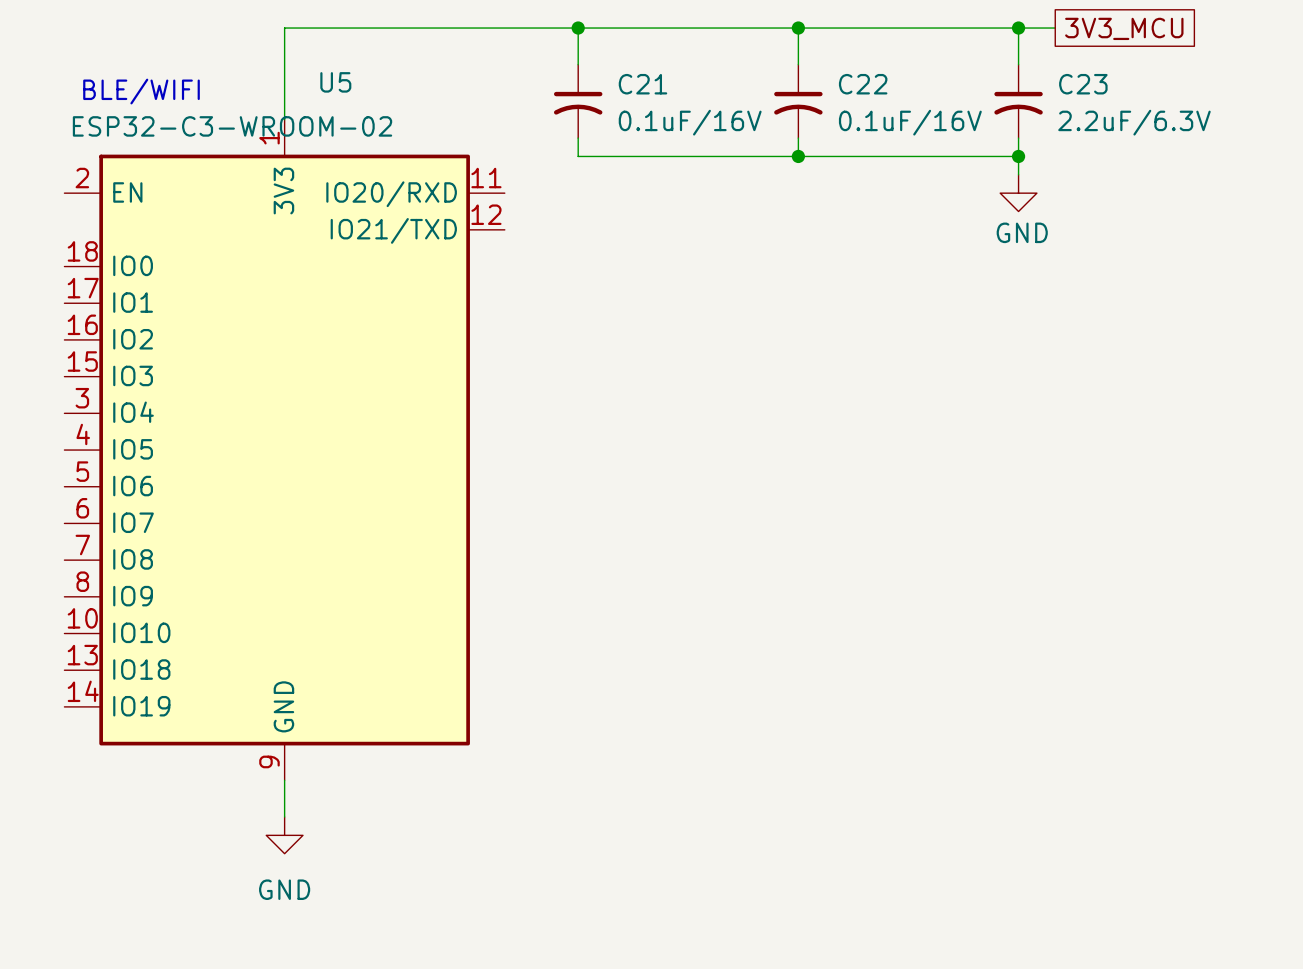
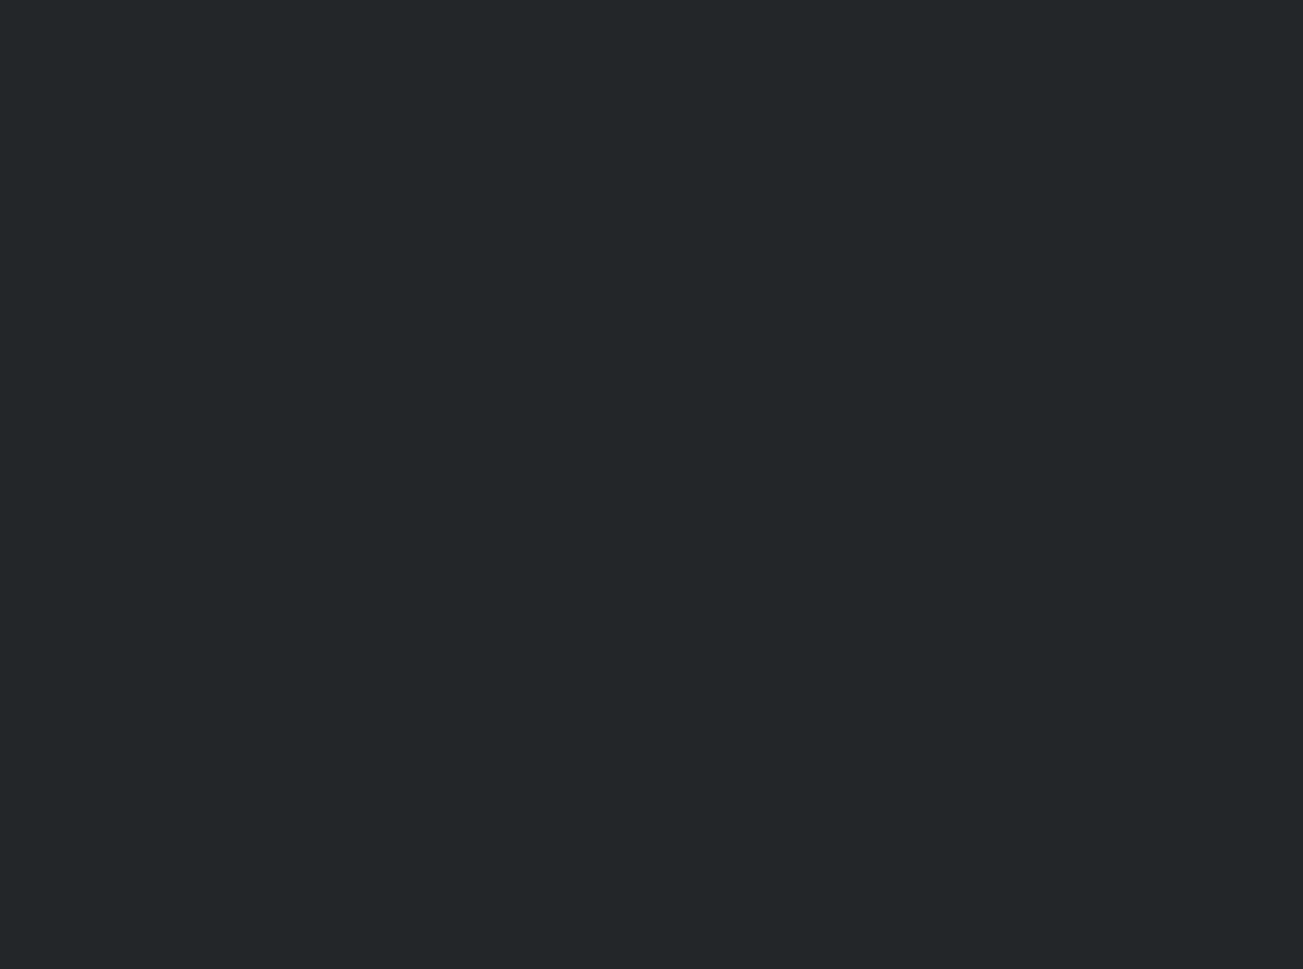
wire: (578, 28) (578, 64) -> none
junction: (578, 28) -> none
wire: (798, 28) (798, 64) -> none
junction: (798, 28) -> none
wire: (1018, 28) (1018, 64) -> none
junction: (1018, 28) -> none
wire: (1055, 28) (284, 28) (284, 119) -> none
global label: 3V3_MCU (1124, 28) -> none
text: BLE/WIFI (141, 91) -> none
C21: 0.1uF/16V (578, 101) -> none
C22: 0.1uF/16V (798, 101) -> none
C23: 2.2uF/6.3V (1018, 101) -> none
wire: (578, 138) (578, 156) (1018, 156) -> none
wire: (798, 138) (798, 156) -> none
wire: (1018, 138) (1018, 174) -> none
junction: (798, 156) -> none
junction: (1018, 156) -> none
power symbol: GND (1018, 193) -> none
U5: ESP32-C3-WROOM-02 (284, 450) -> none
wire: (284, 780) (284, 817) -> none
power symbol: GND (284, 835) -> none

